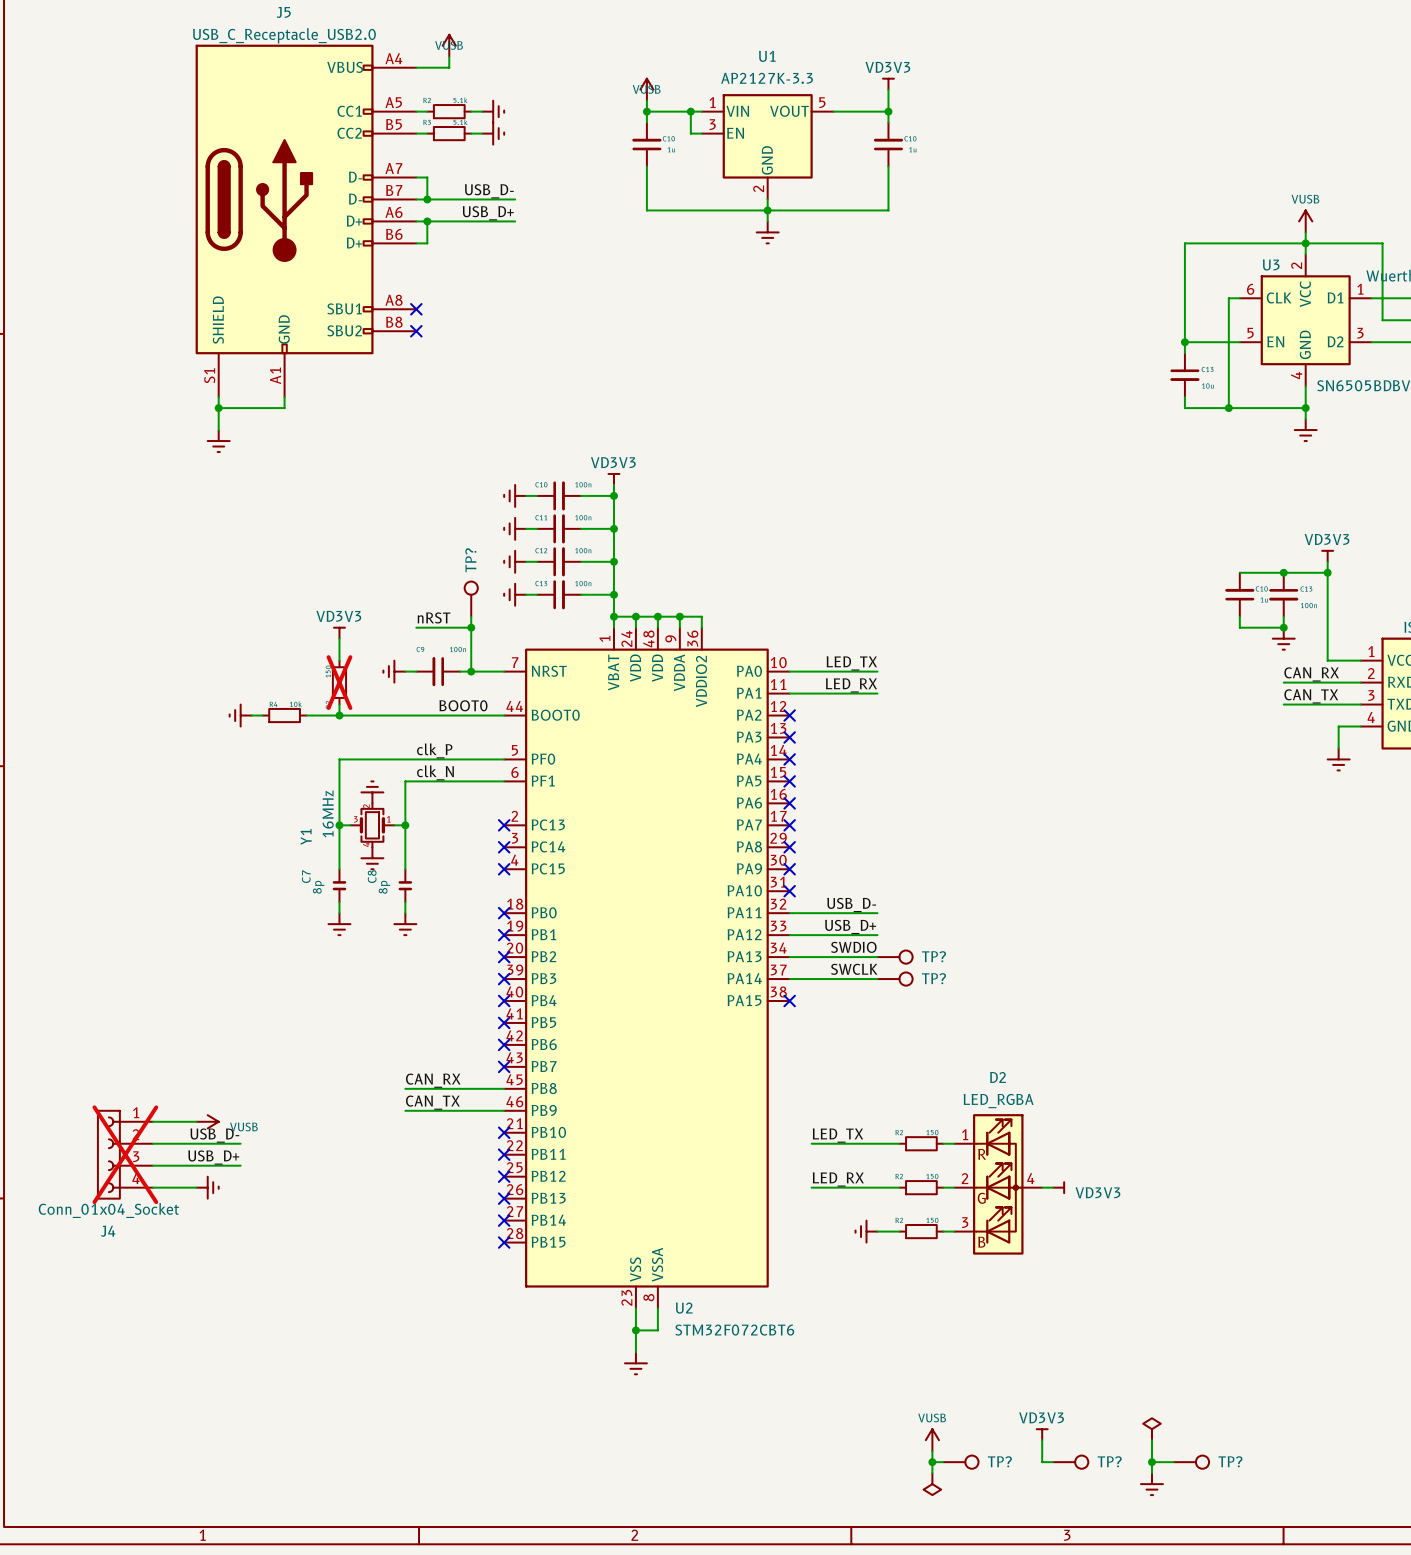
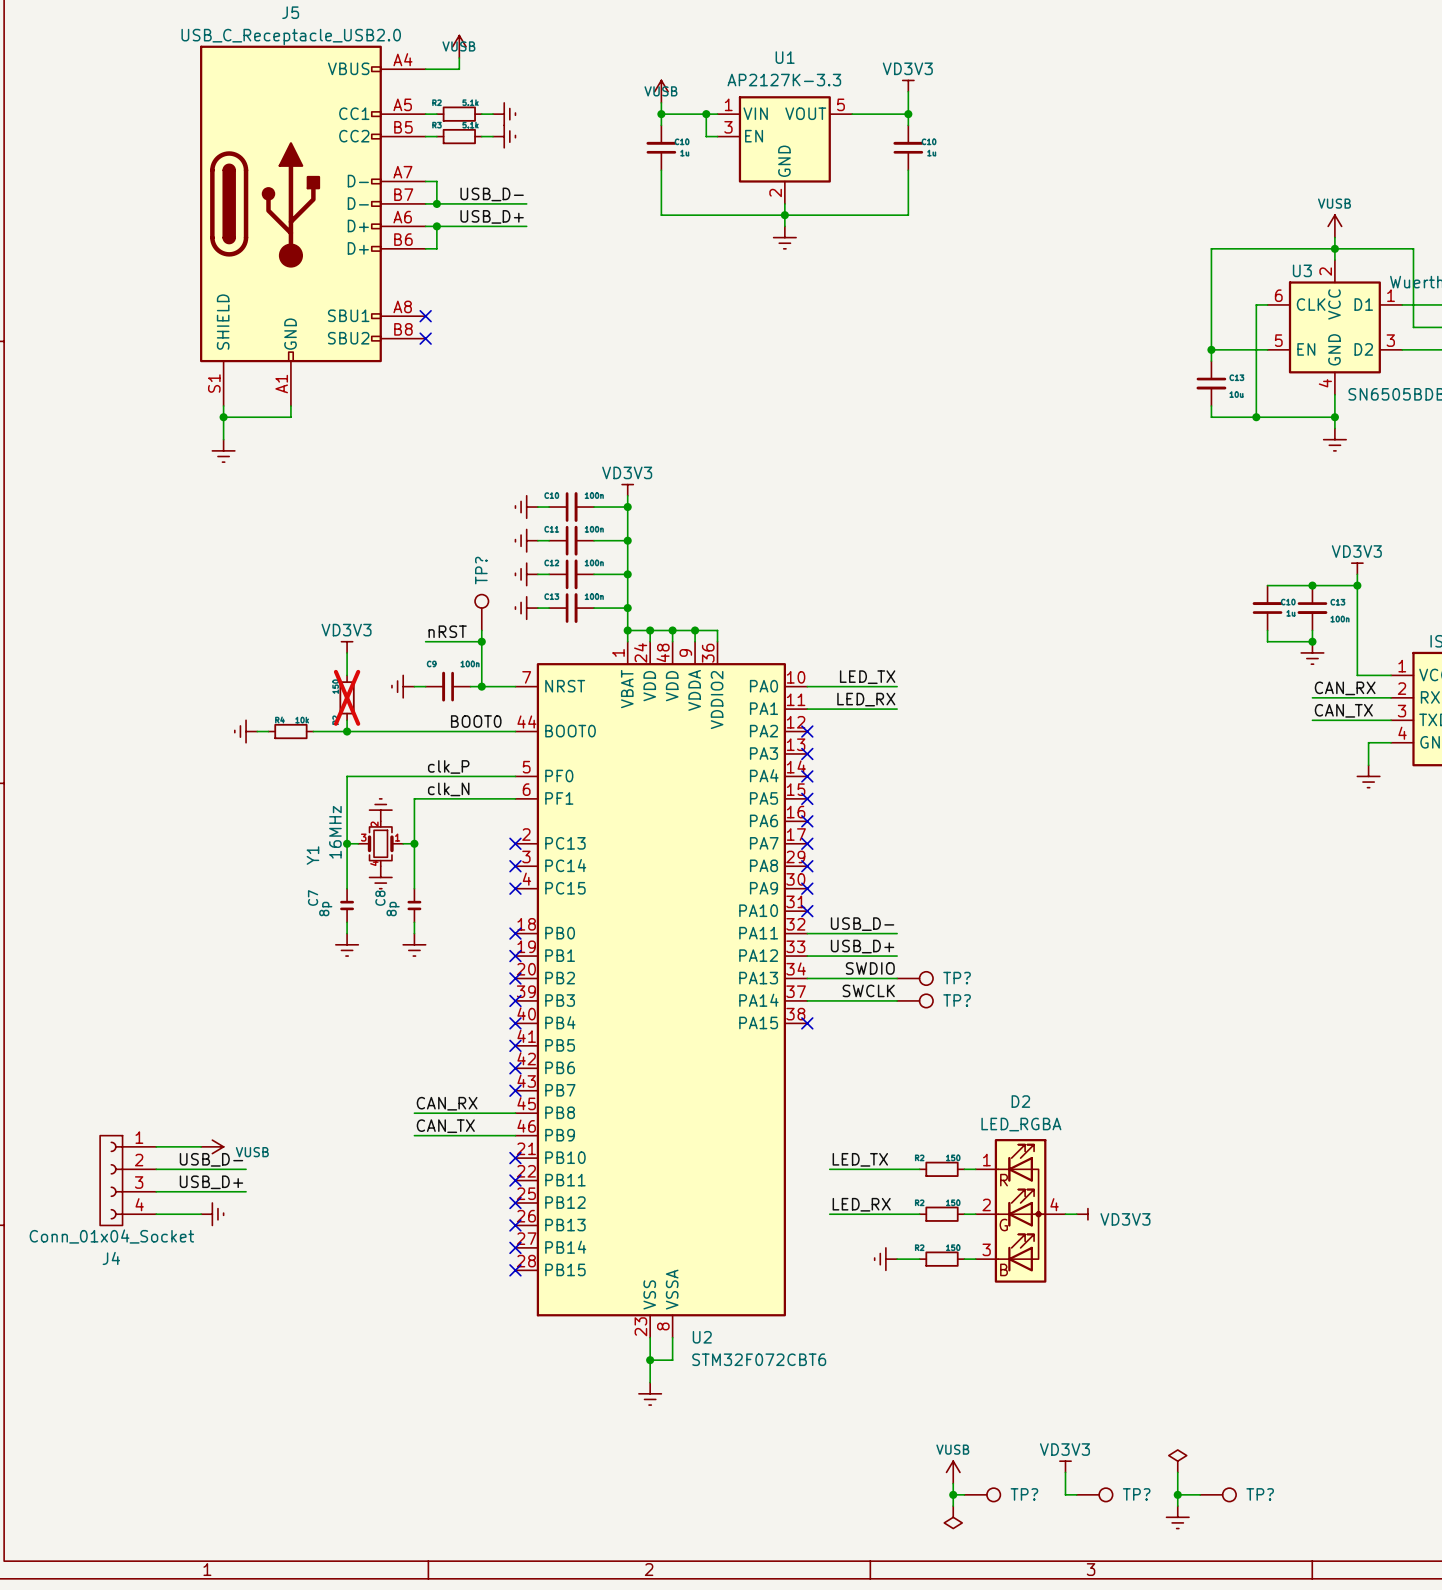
J4 do-not-place cross: (125, 1154) -> none

